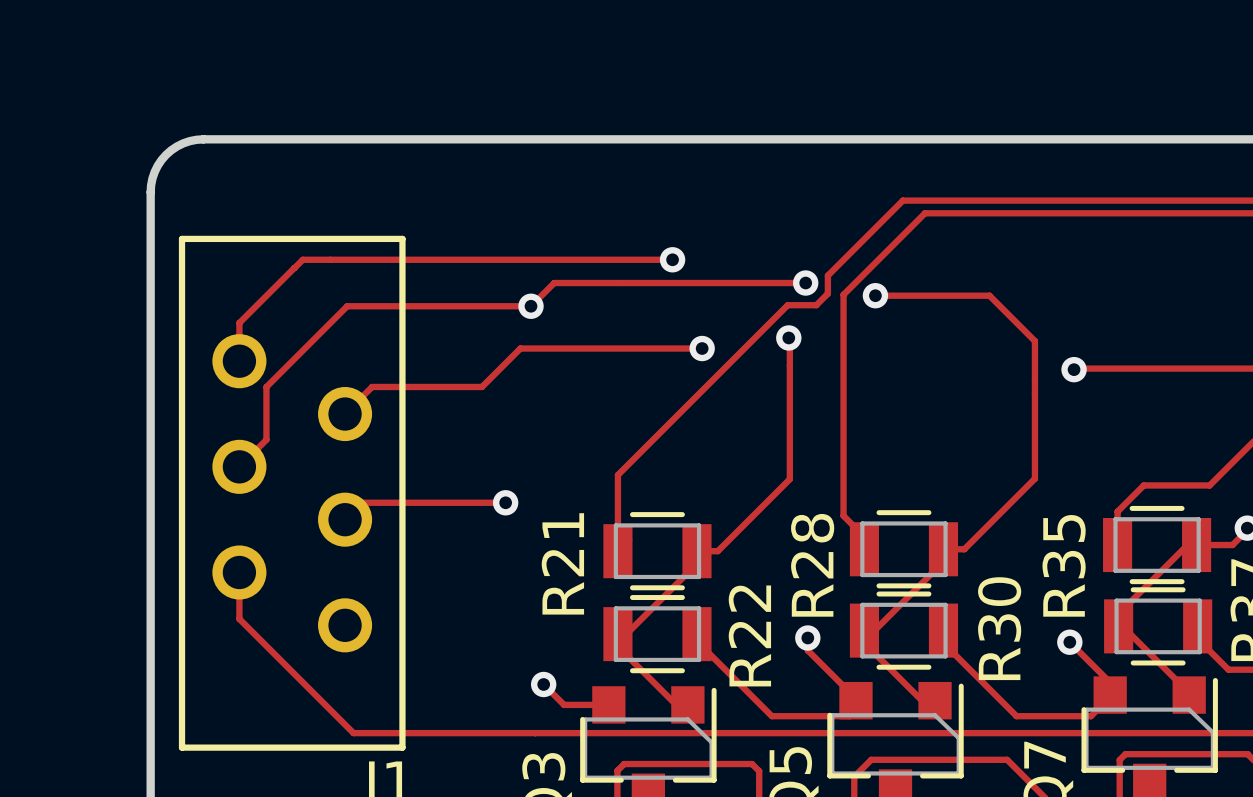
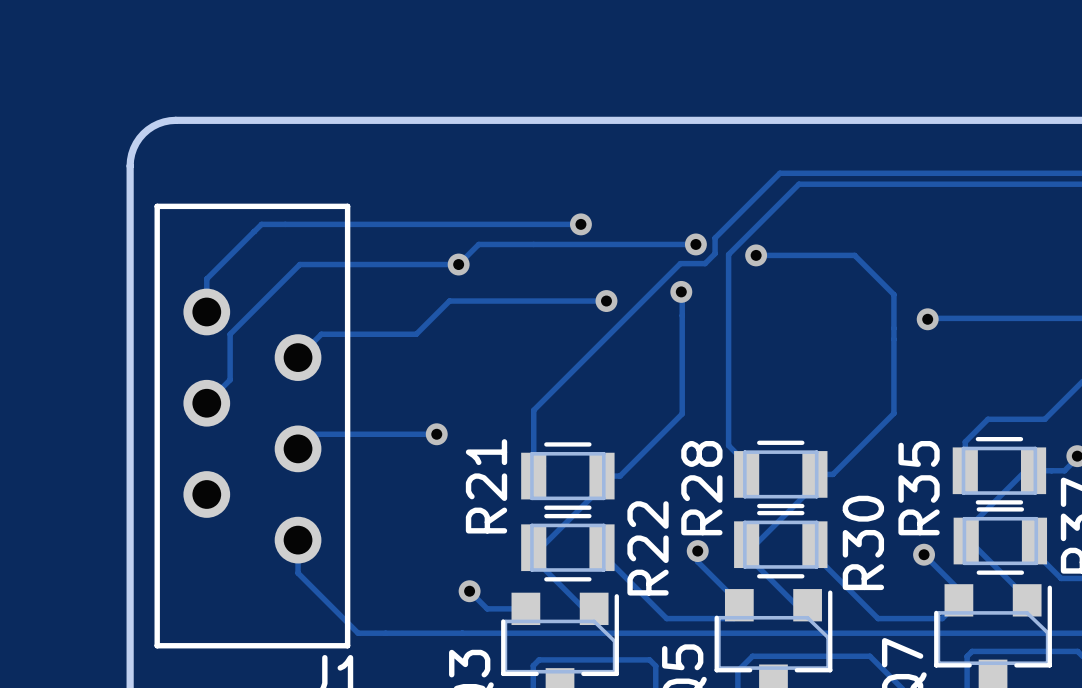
track: (239, 572) (239, 618) (353, 733) (414, 733) -> (298, 540) (298, 573) (358, 633)

